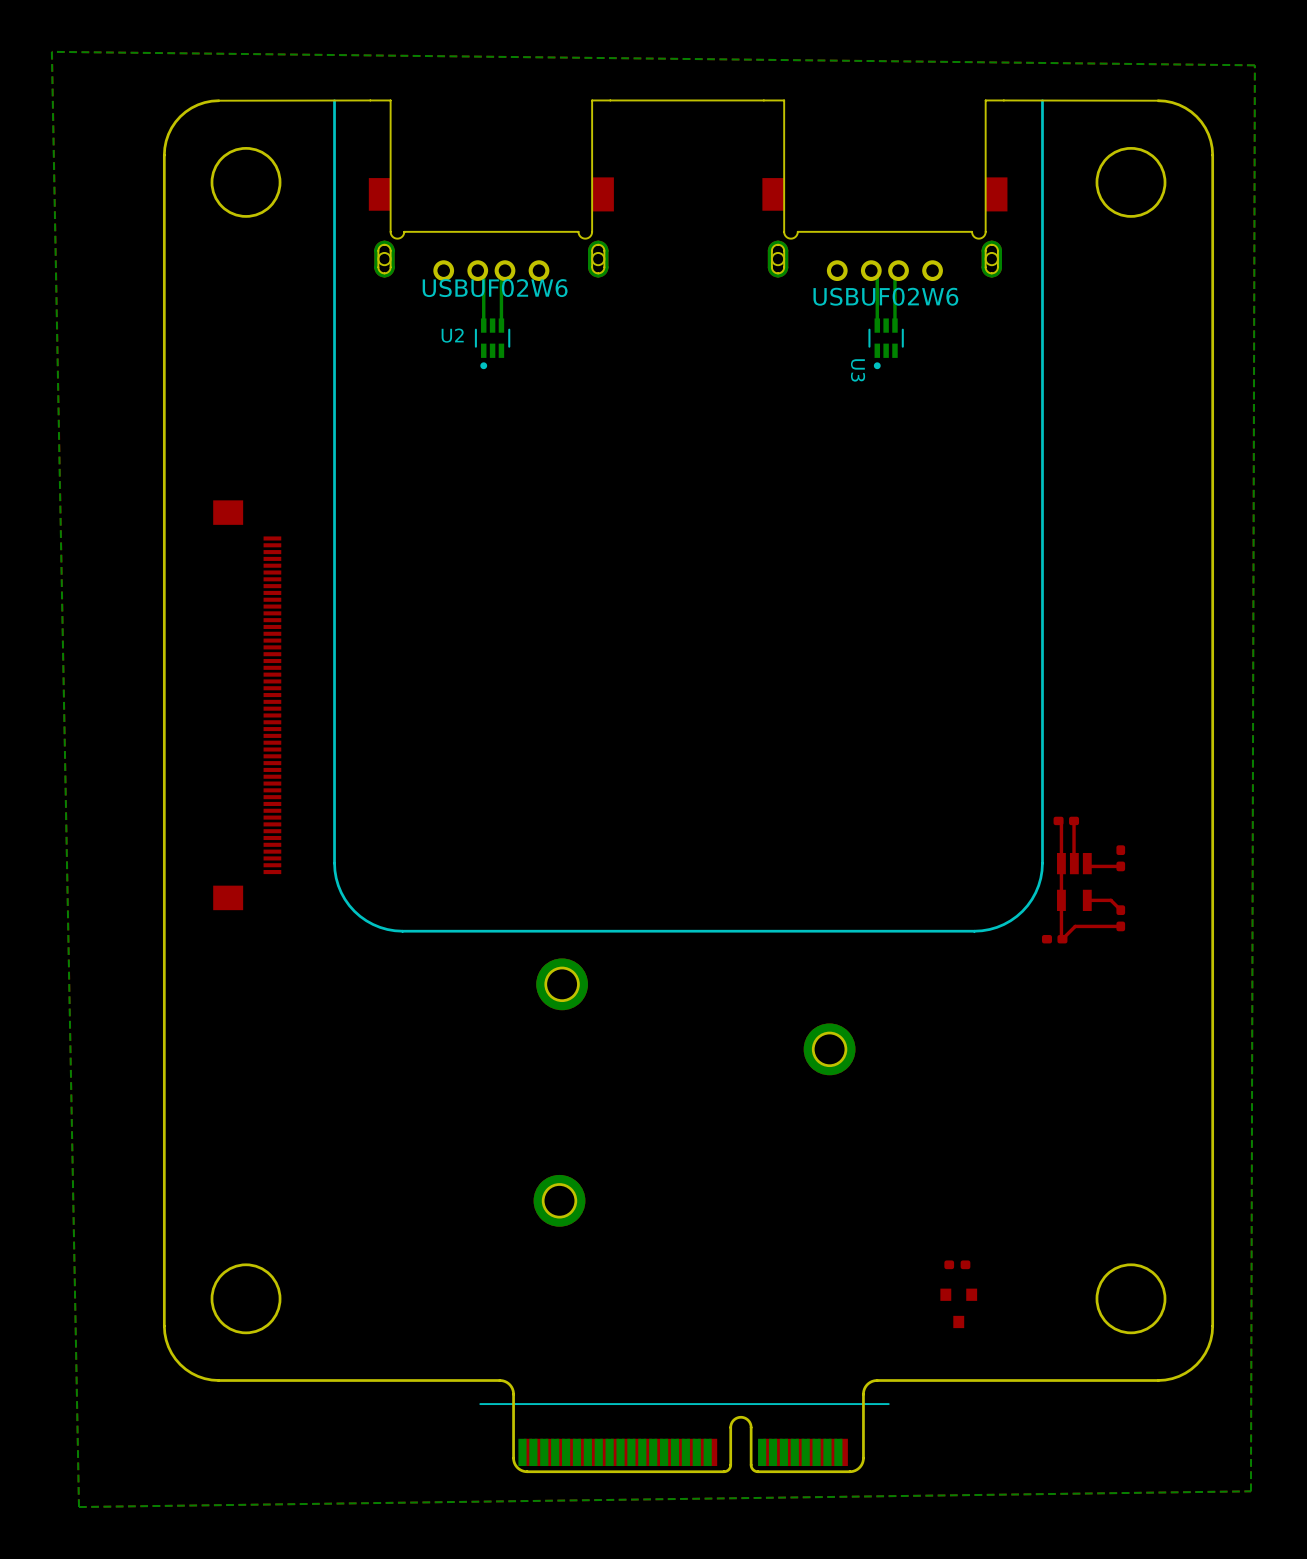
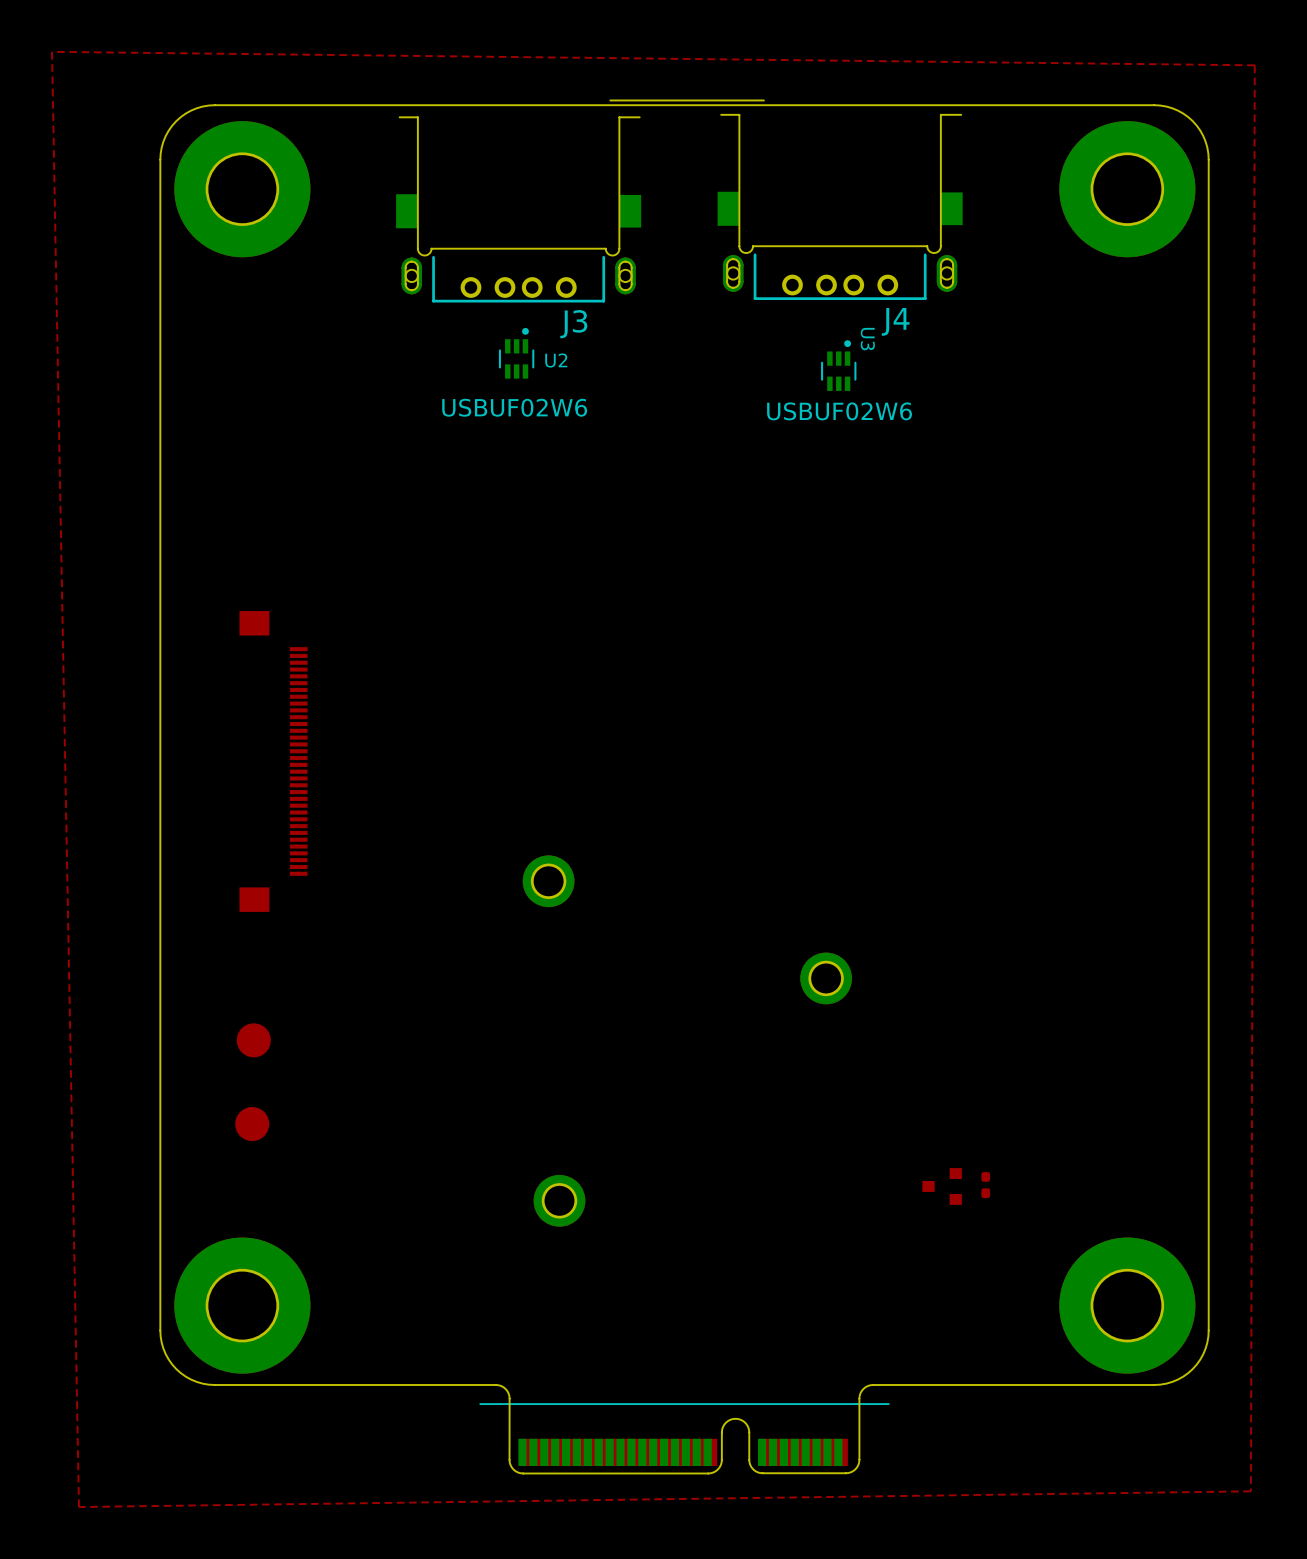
bottom zone outline: (51, 51) (1254, 65) (1250, 1491) (78, 1507) (51, 51) -> none
board edge: (1003, 100) (1158, 100) (1172, 102) (1185, 108) (1196, 116) (1205, 127) (1212, 148) (1212, 1333) (1205, 1353) (1196, 1364) (1185, 1373) (1165, 1380) (871, 1381) (866, 1385) (863, 1392) (862, 1461) (858, 1468) (849, 1471) (754, 1470) (751, 1465) (750, 1424) (747, 1419) (740, 1417) (734, 1419) (731, 1424) (730, 1465) (725, 1471) (525, 1471) (518, 1468) (514, 1461) (513, 1392) (510, 1385) (505, 1381) (211, 1380) (197, 1376) (185, 1369) (175, 1359) (168, 1346) (164, 1326) (164, 148) (171, 127) (180, 116) (191, 108) (204, 102) (218, 100) (370, 100) -> none
line: (1042, 100) (1042, 870) (1035, 892) (1022, 911) (1010, 920) (996, 927) (974, 931) (402, 931) (387, 929) (373, 924) (360, 916) (349, 905) (338, 885) (334, 863) (334, 100) -> none
board edge: none -> (1154, 105) (214, 105) (191, 110) (172, 125) (163, 141) (160, 159) (160, 1330) (165, 1354) (180, 1373) (196, 1381) (214, 1385) (499, 1385) (505, 1389) (509, 1396) (509, 1463) (513, 1469) (521, 1473) (711, 1473) (717, 1469) (721, 1463) (722, 1427) (728, 1420) (735, 1418) (742, 1420) (748, 1427) (749, 1461) (755, 1471) (762, 1473) (845, 1473) (854, 1470) (859, 1462) (859, 1396) (863, 1389) (869, 1385) (1160, 1384) (1183, 1376) (1196, 1364) (1205, 1348) (1208, 1330) (1208, 159) (1205, 141) (1192, 121) (1172, 108) (1154, 105)
round board edge: [210, 147, 282, 218] -> none
round board edge: [1095, 147, 1167, 218] -> none
part: none -> (242, 189)
part: none -> (1127, 189)
J3 side: top (491, 190) -> bottom (518, 209)
J4 side: top (884, 190) -> bottom (840, 207)
bottom track: (477, 270) (483, 276) (483, 325) -> none
bottom track: (504, 270) (501, 274) (501, 325) -> none
bottom track: (871, 270) (877, 276) (877, 325) -> none
bottom track: (898, 270) (894, 274) (894, 325) -> none
U2 rotation: 0° (492, 343) -> 180° (516, 353)
U3 rotation: 0° (886, 343) -> 180° (838, 365)
U3 position: (886, 343) -> (838, 365)
part: (247, 705) -> none
part: none -> (273, 761)
top track: (1058, 820) (1061, 823) (1061, 938) (1075, 926) (1120, 926) -> none
part: (1066, 820) -> none
top track: (1074, 820) (1074, 863) -> none
part: (1120, 858) -> none
top track: (1087, 863) (1090, 866) (1120, 866) -> none
part: (1074, 881) -> none
top track: (1087, 900) (1110, 900) (1120, 910) -> none
part: (1120, 918) -> none
part: (1054, 939) -> none
part position: (562, 984) -> (548, 881)
part: none -> (253, 1040)
part position: (829, 1049) -> (826, 978)
part: none -> (252, 1124)
round board edge: [210, 1263, 282, 1335] -> none
round board edge: [1095, 1263, 1167, 1335] -> none
part rotation: 0° (957, 1264) -> 90° clockwise (985, 1185)
part position: (957, 1264) -> (985, 1185)
part: none -> (242, 1305)
part: none -> (1127, 1305)
part rotation: 0° (958, 1308) -> 90° clockwise (942, 1186)
part position: (958, 1308) -> (942, 1186)

